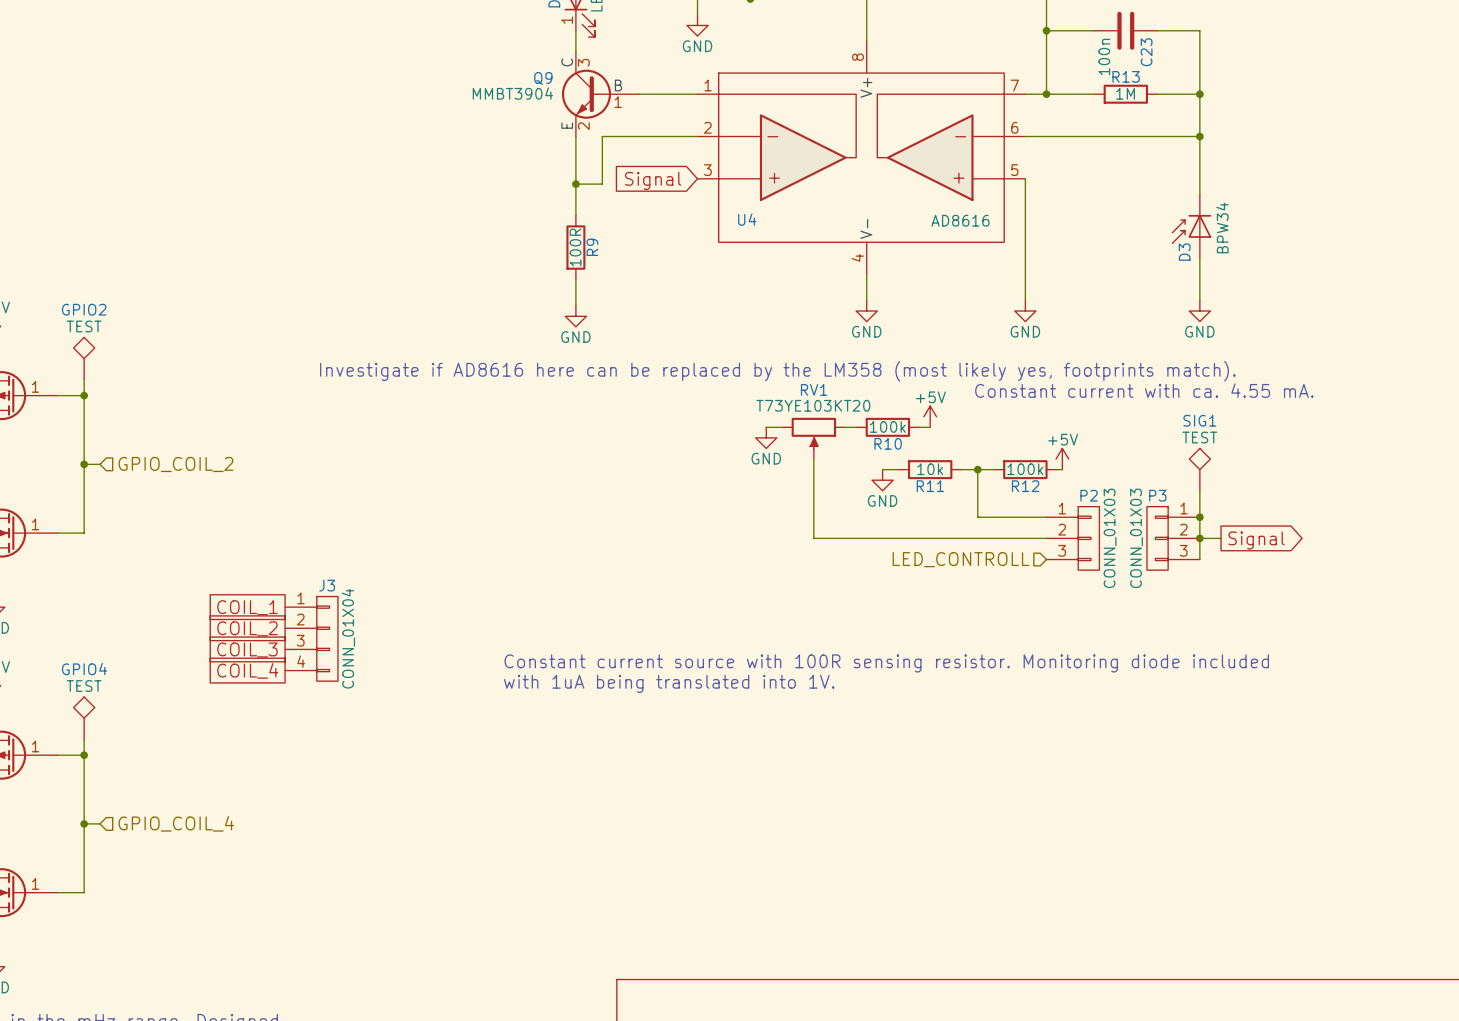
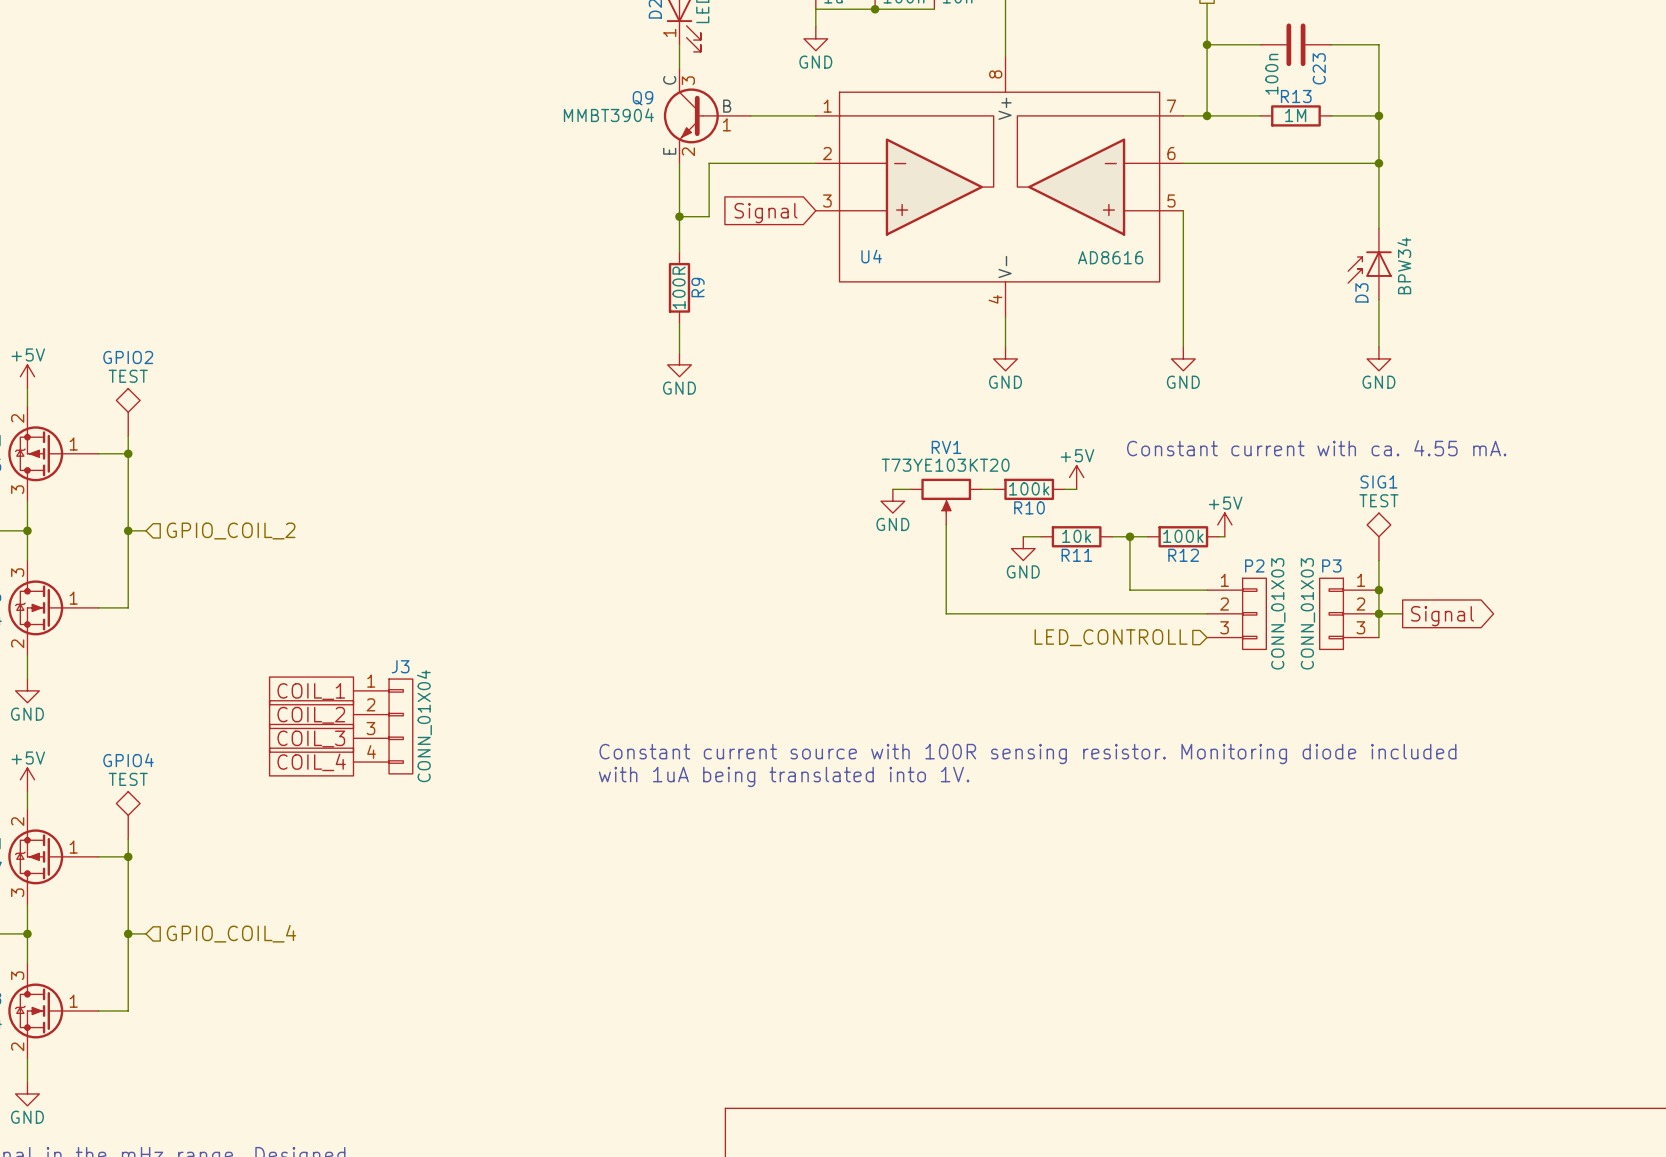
text: Investigate if AD8616 here can be replaced by the LM358 (most likely yes, footprints match). (777, 371) -> none

